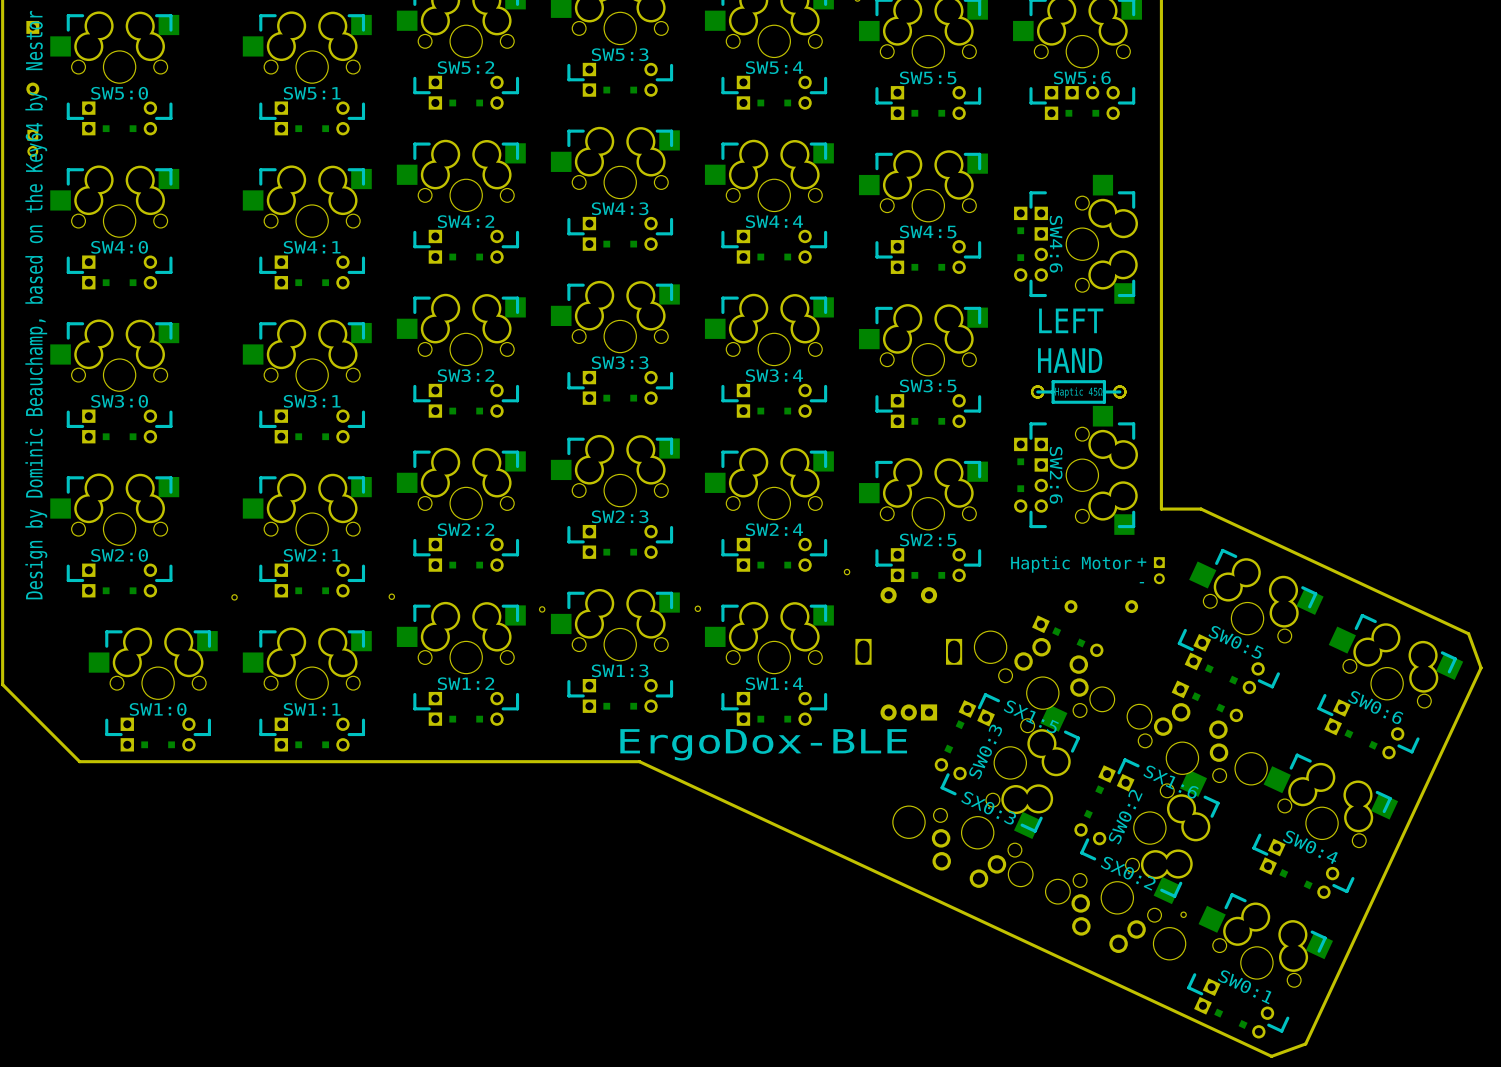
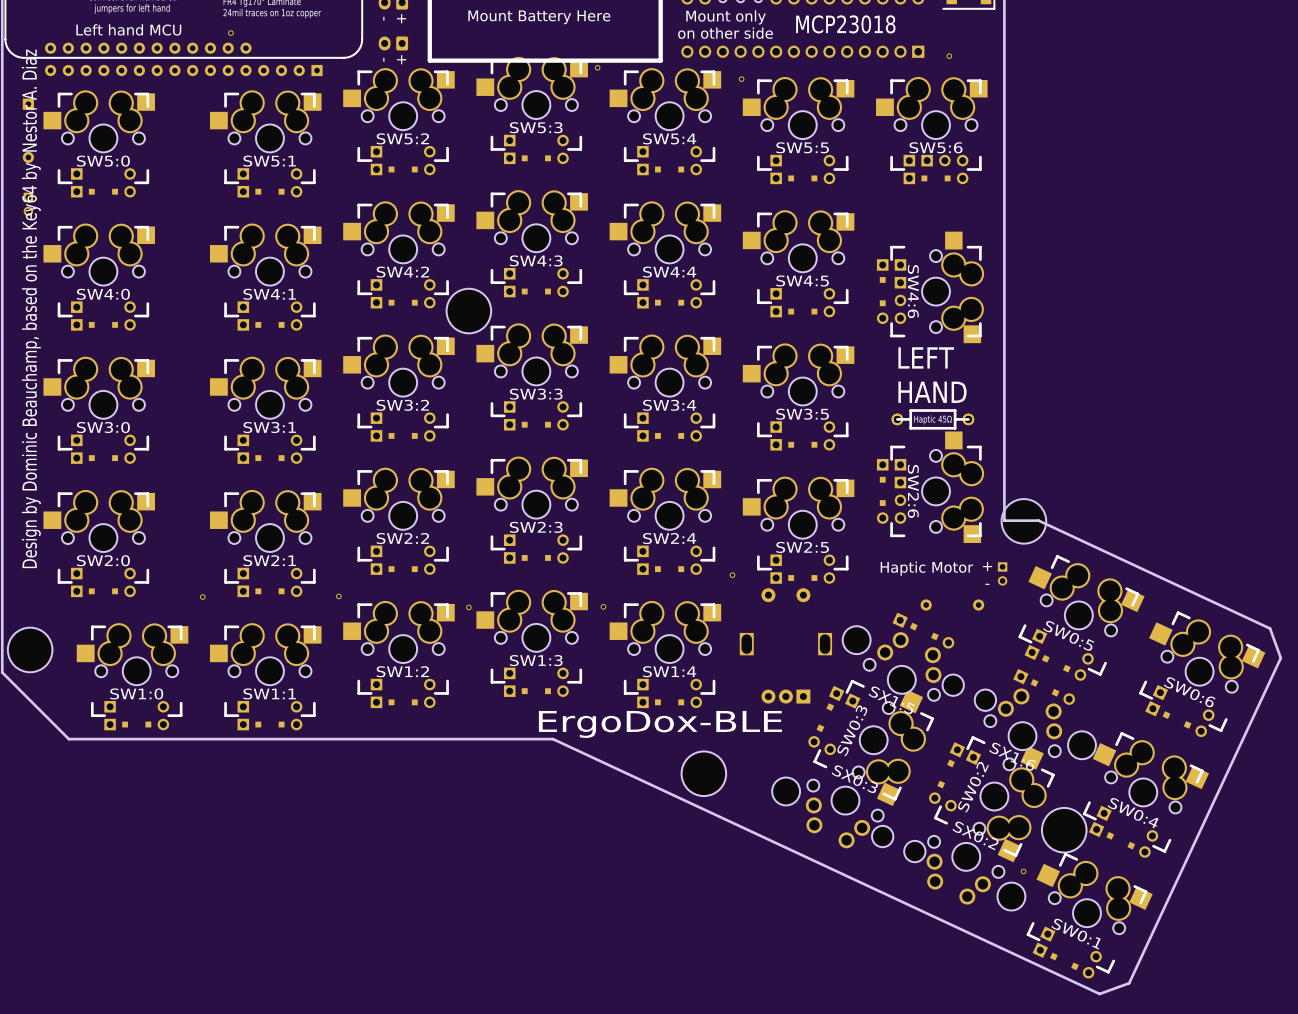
part: none -> (468, 311)
part: none -> (1023, 521)
part: none -> (30, 649)
part: none -> (703, 773)
part: none -> (1064, 830)

